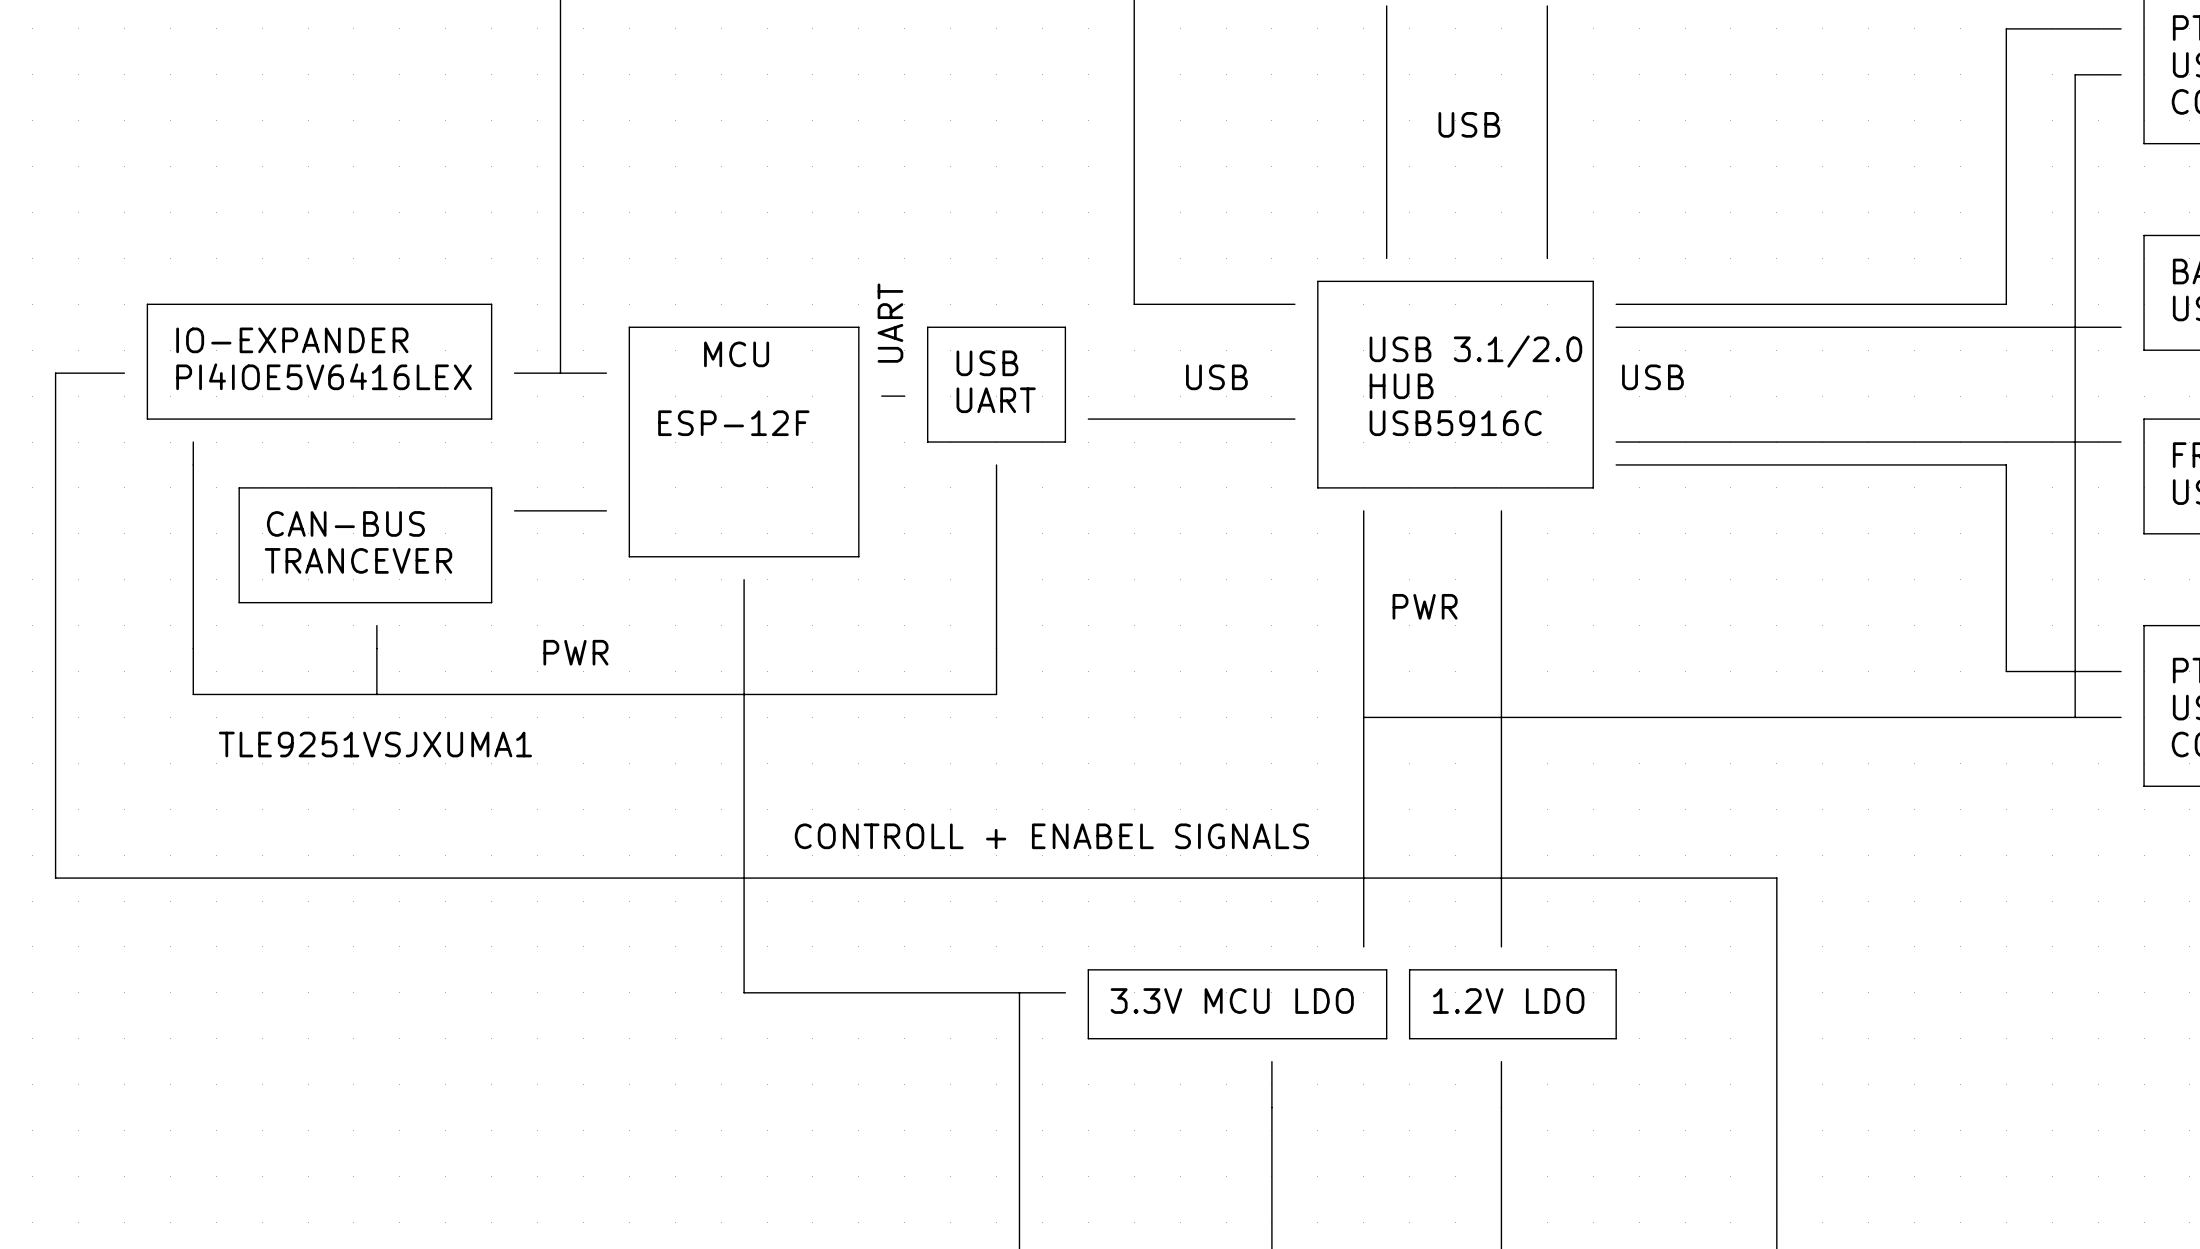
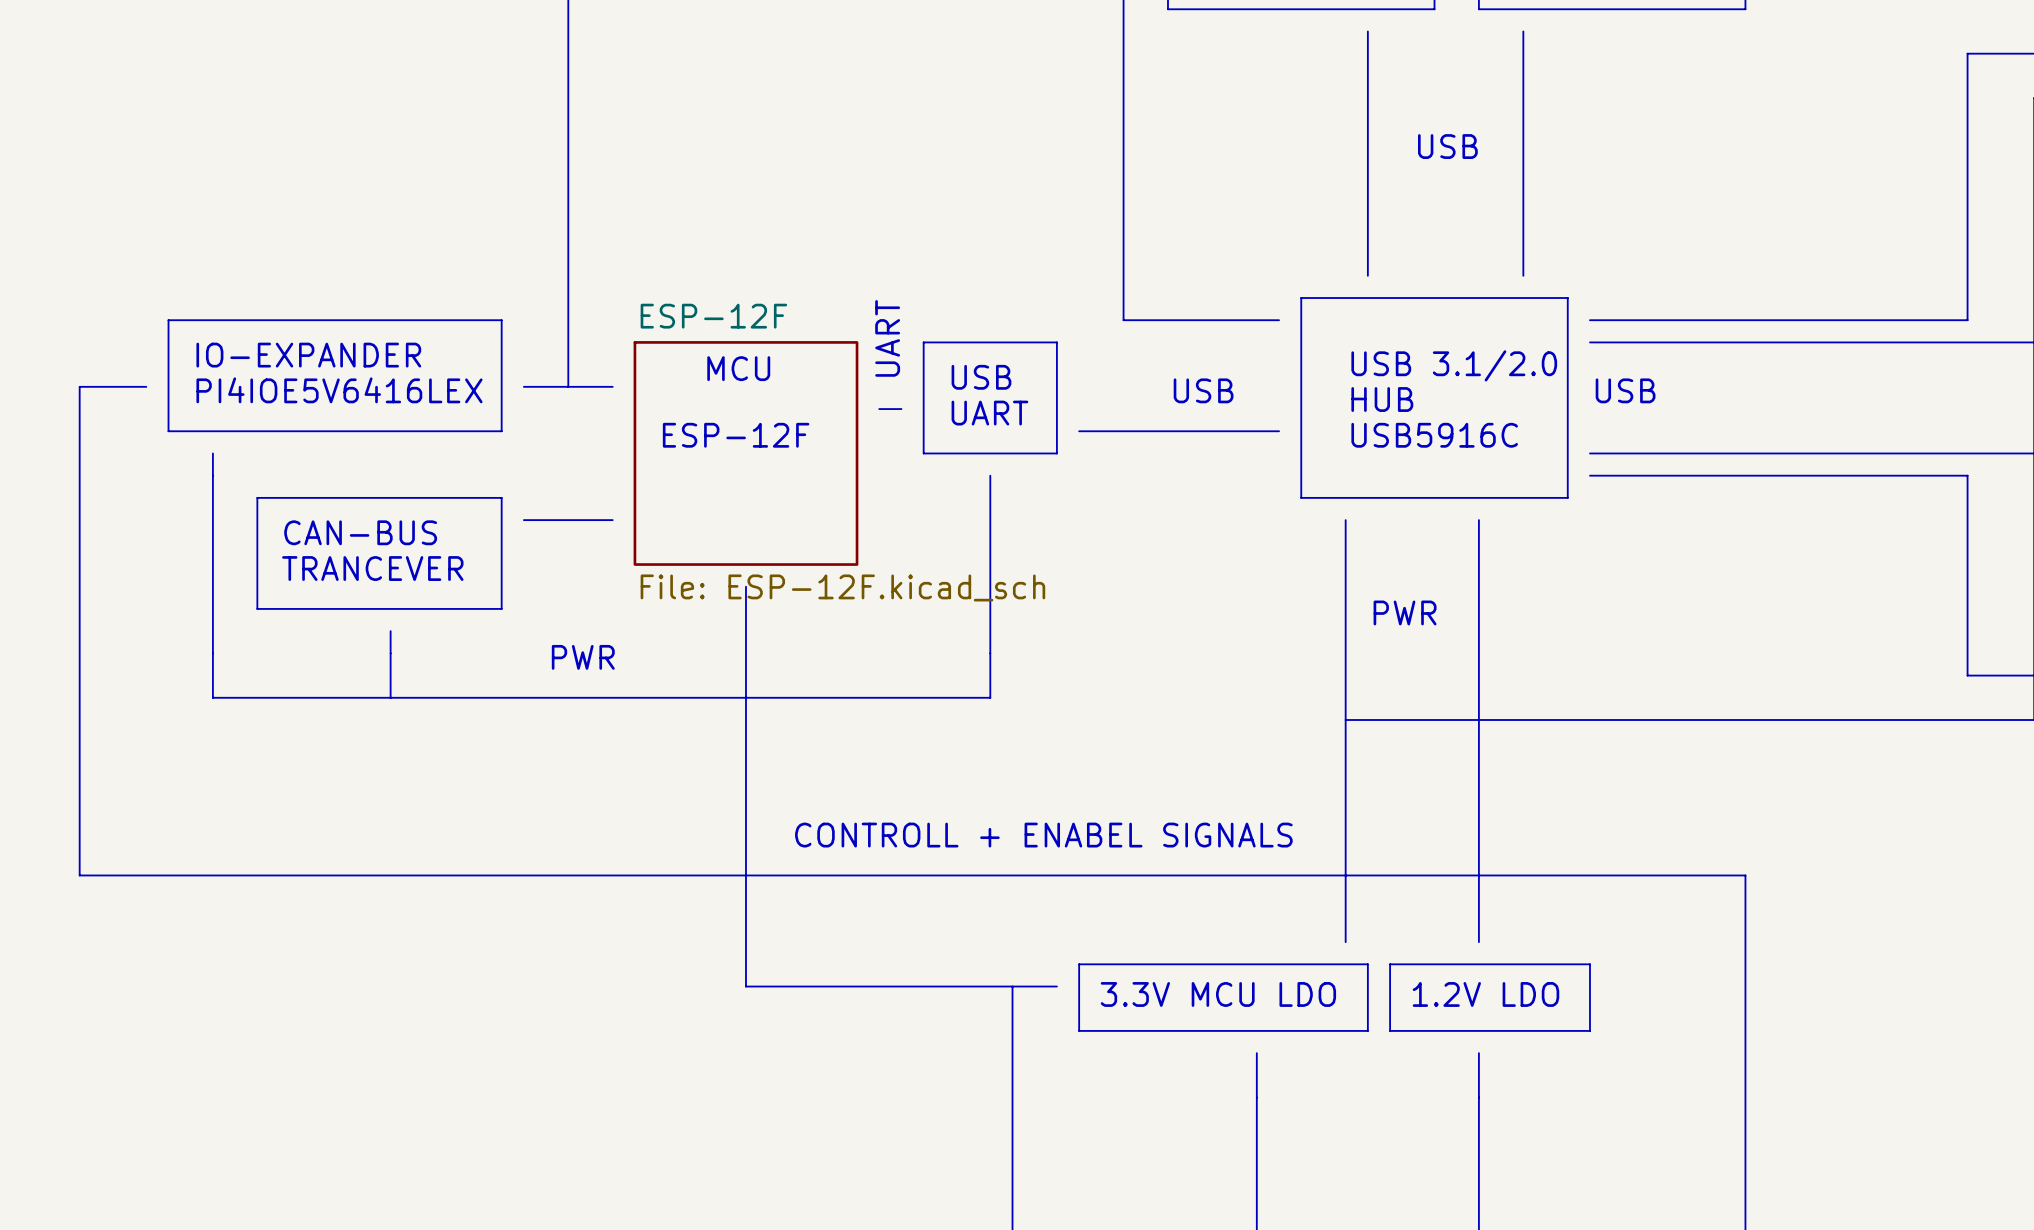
line: (629, 327) (858, 327) (858, 556) (629, 556) (629, 327) -> none
sheet ESP-12F: none -> File: ESP-12F.kicad_sch (745, 453)
text: TLE9251VSJXUMA1 (375, 744) -> none

